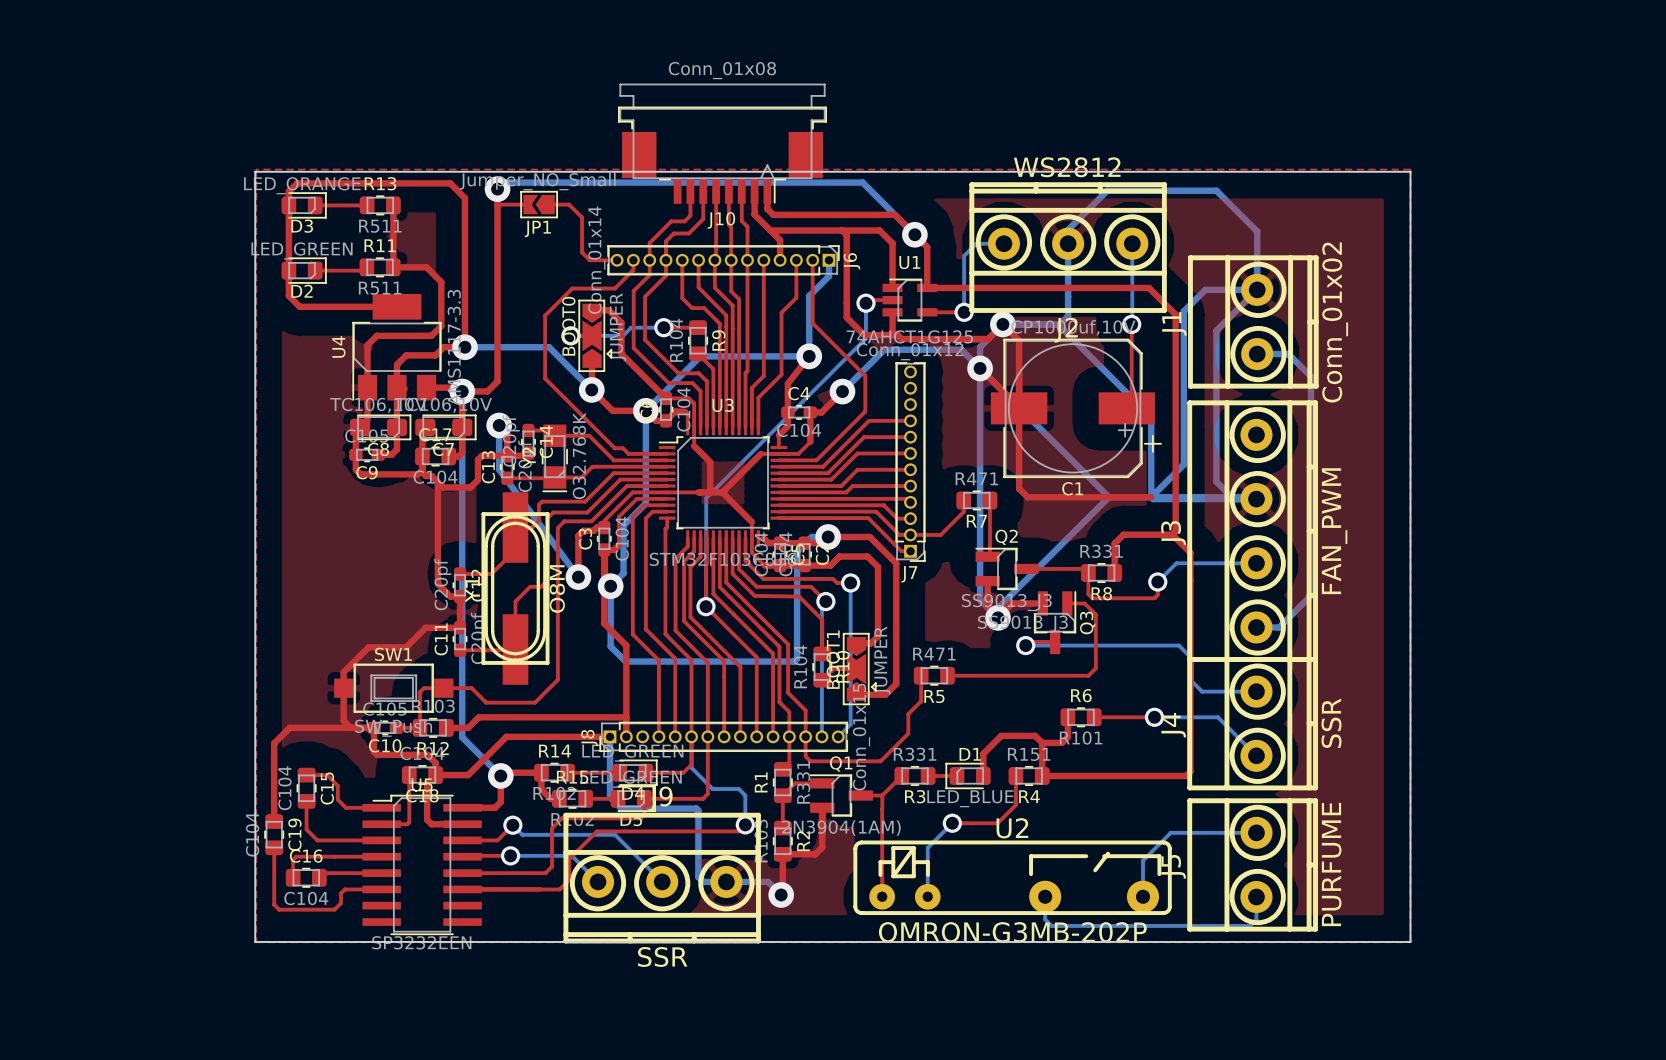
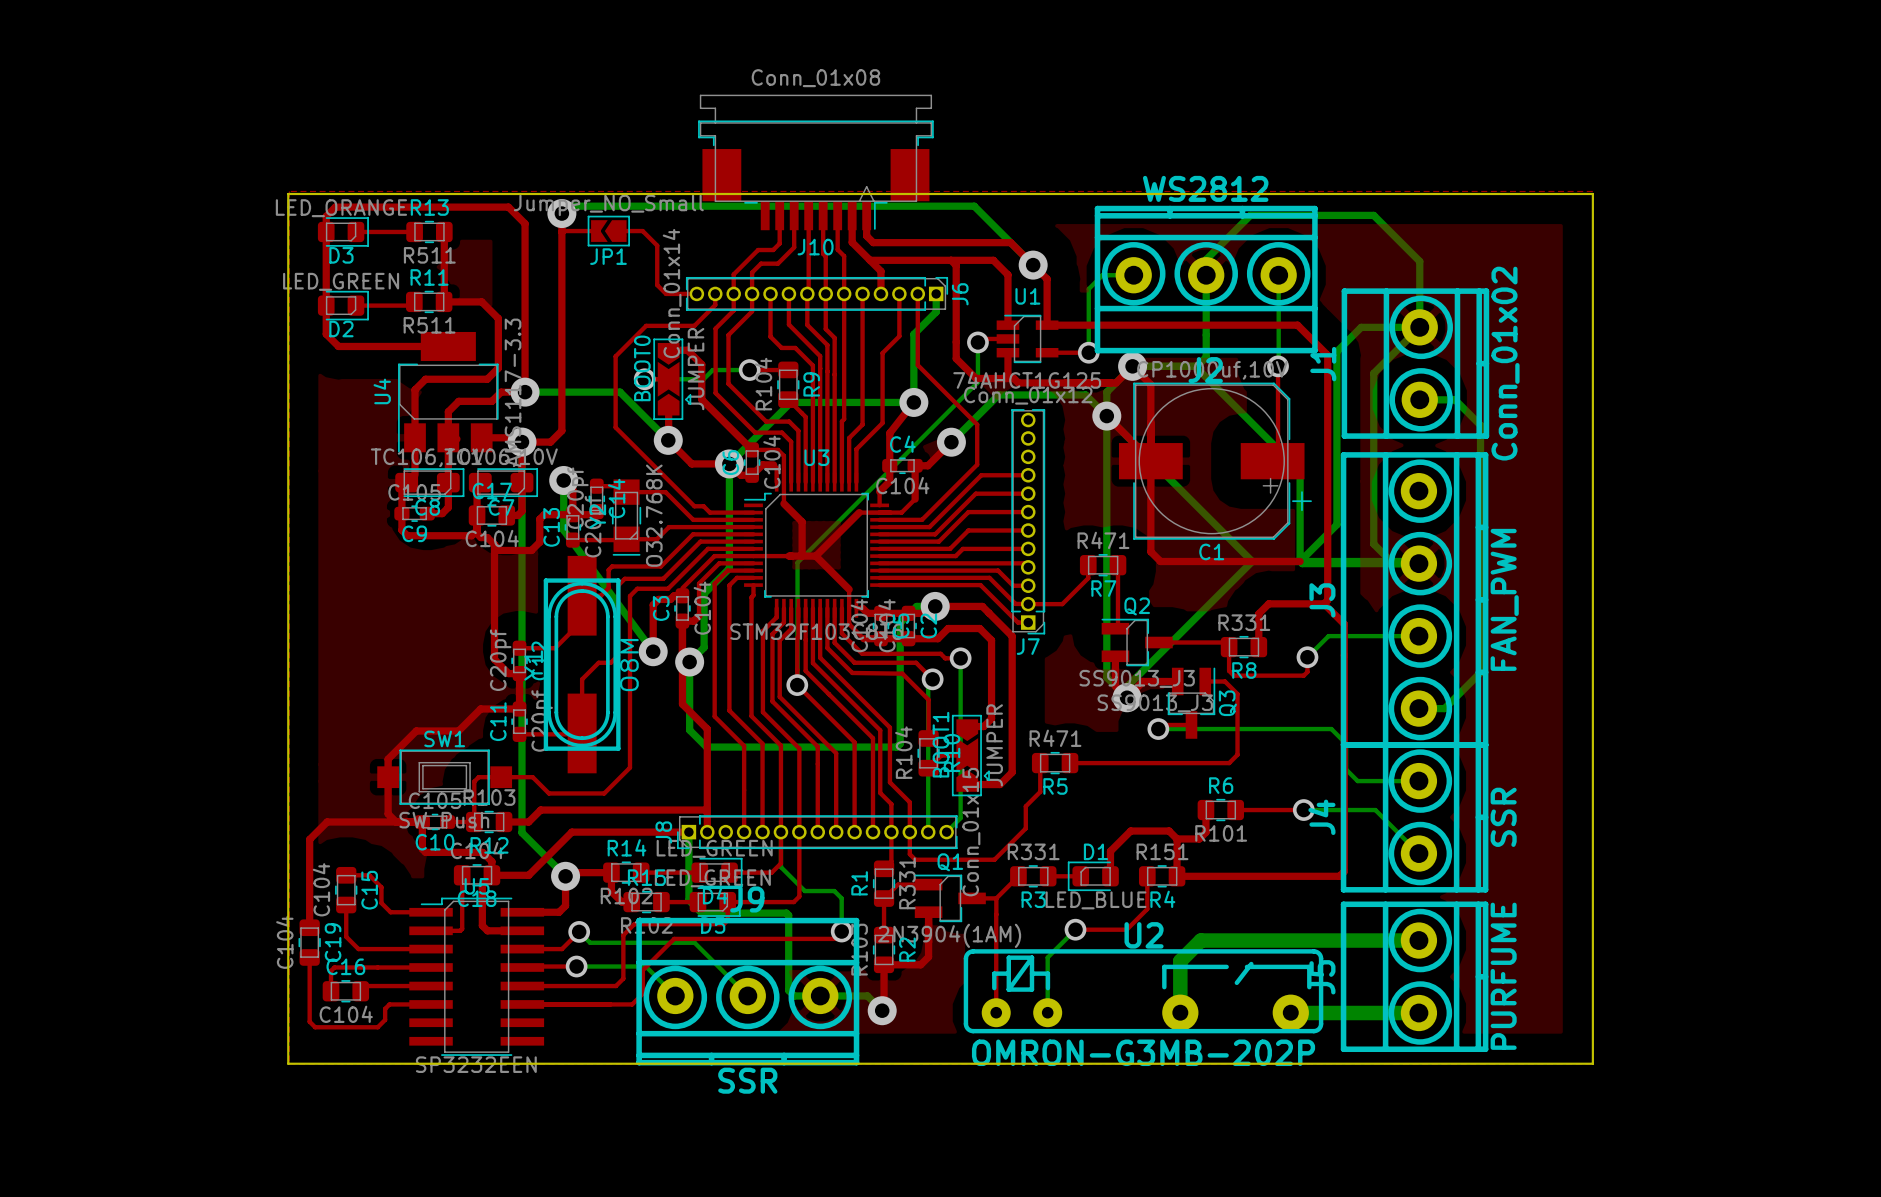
bottom track: (1170, 832) (1143, 860) (1143, 896) -> (1322, 940) (1200, 940) (1180, 961) (1180, 1012)
bottom track width: thin (1170, 832) (1256, 832) -> thick (1322, 940) (1418, 940)
bottom track: (1045, 896) (1045, 919) (1051, 925) (1250, 925) (1256, 919) (1256, 897) -> (1290, 1012) (1418, 1013)

